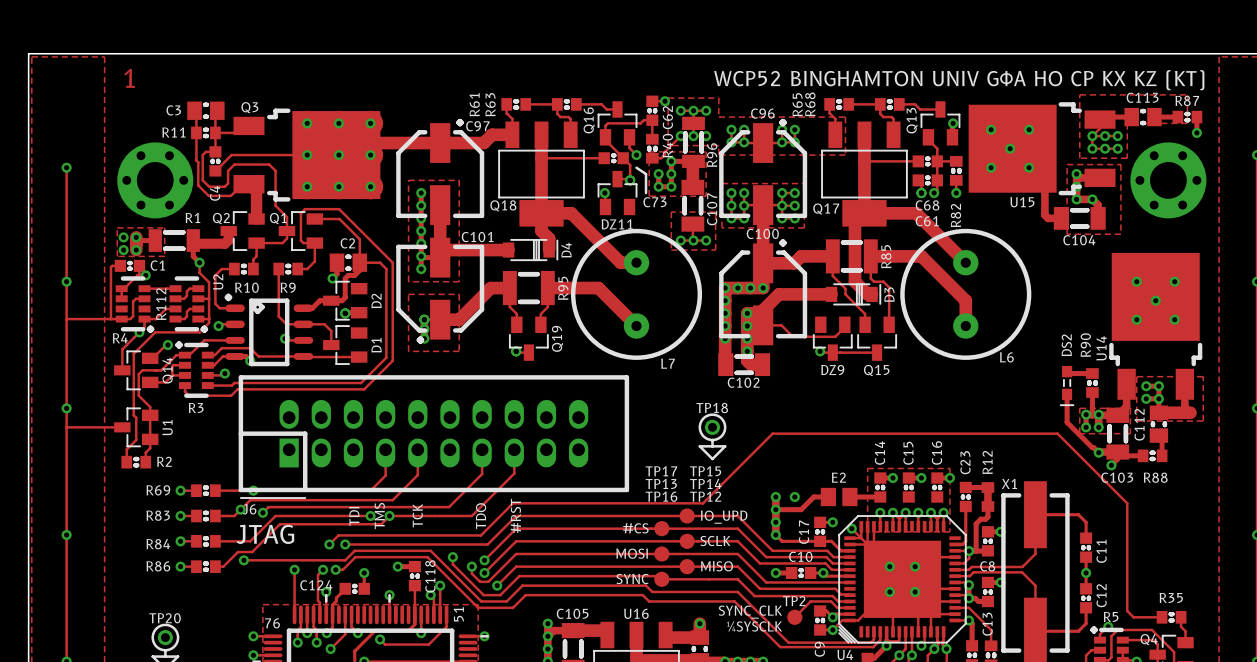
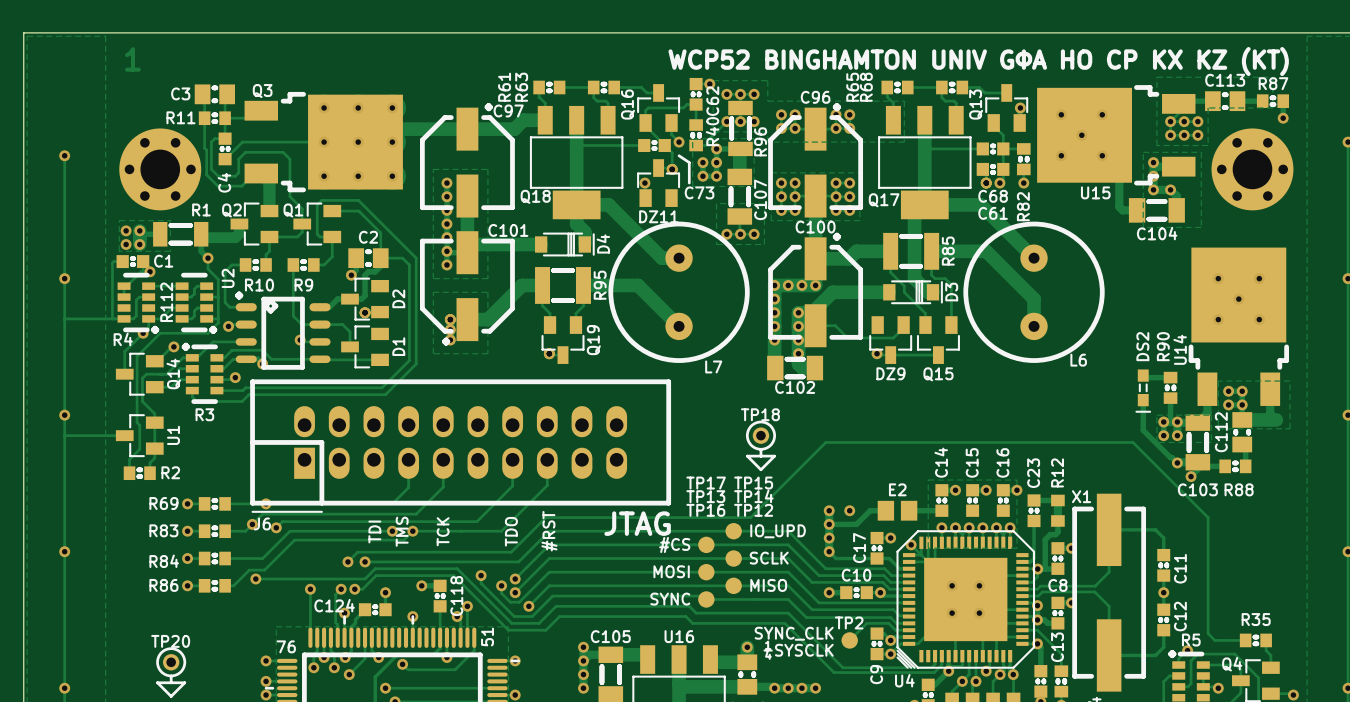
text: none -> JTAG (637, 523)
text: JTAG (265, 534) -> none

